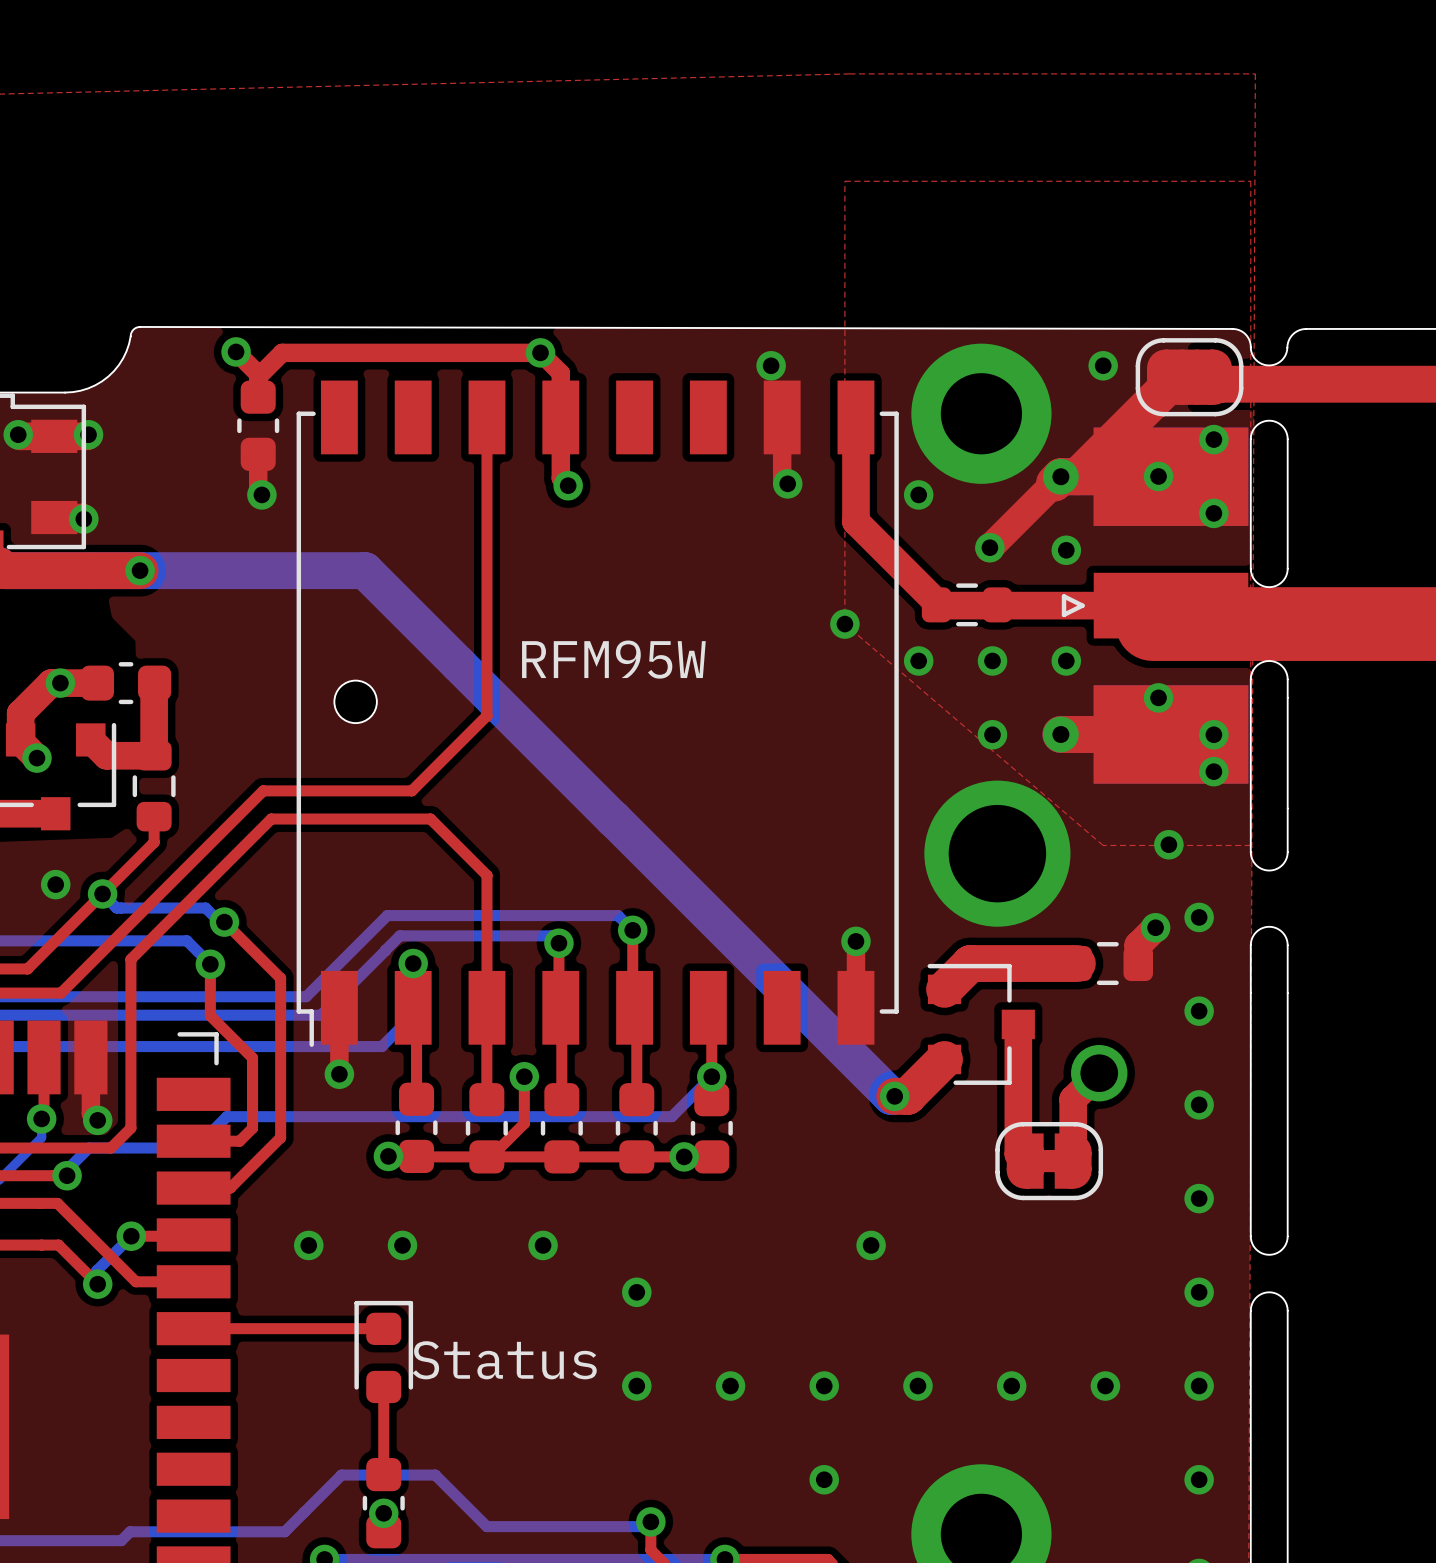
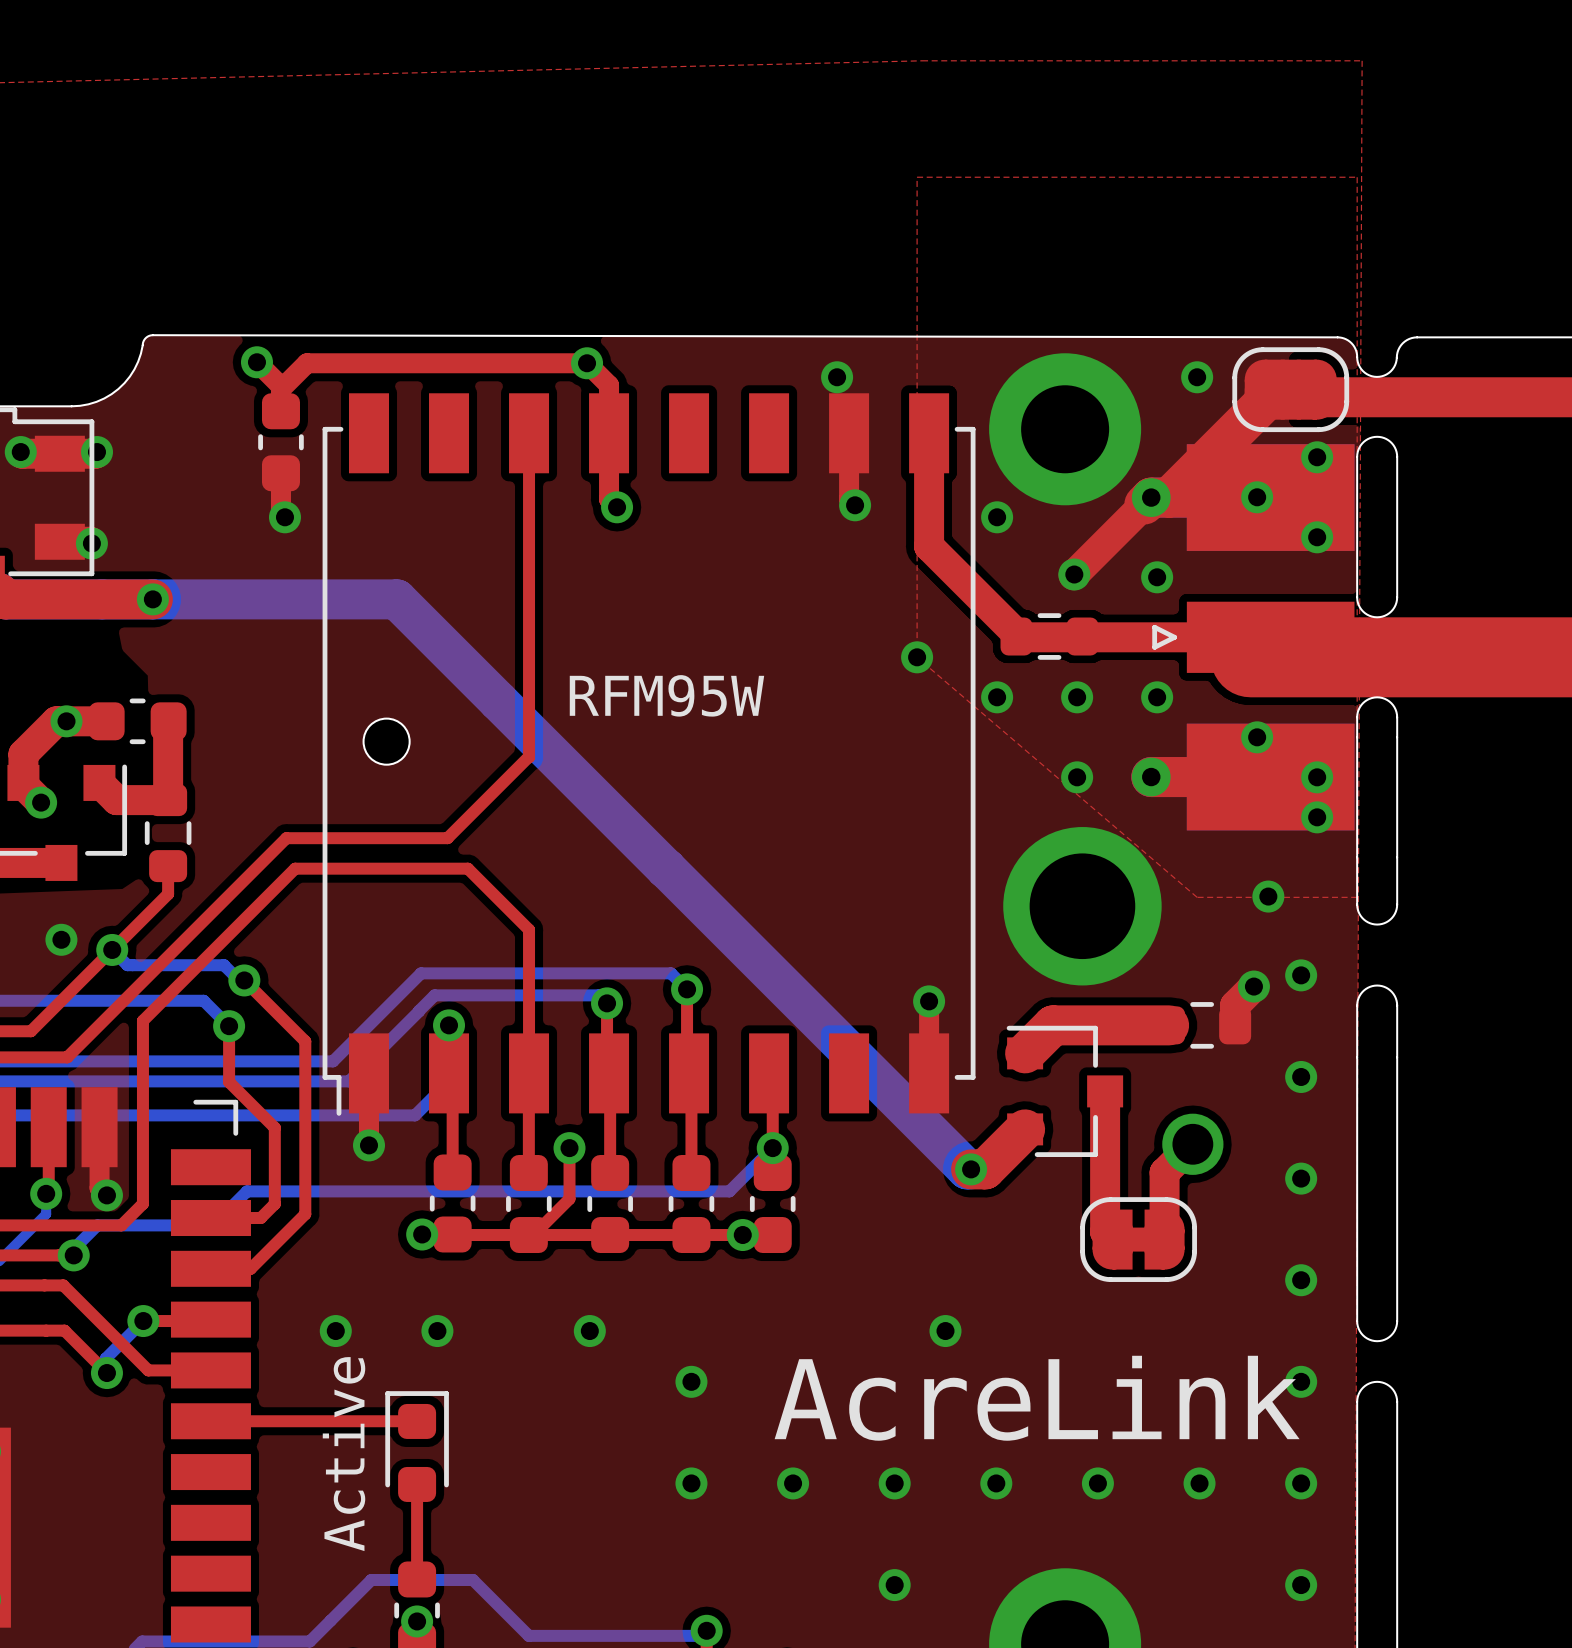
text: none -> AcreLink (1037, 1398)
text: none -> Active (344, 1454)
text: Status (504, 1360) -> none

